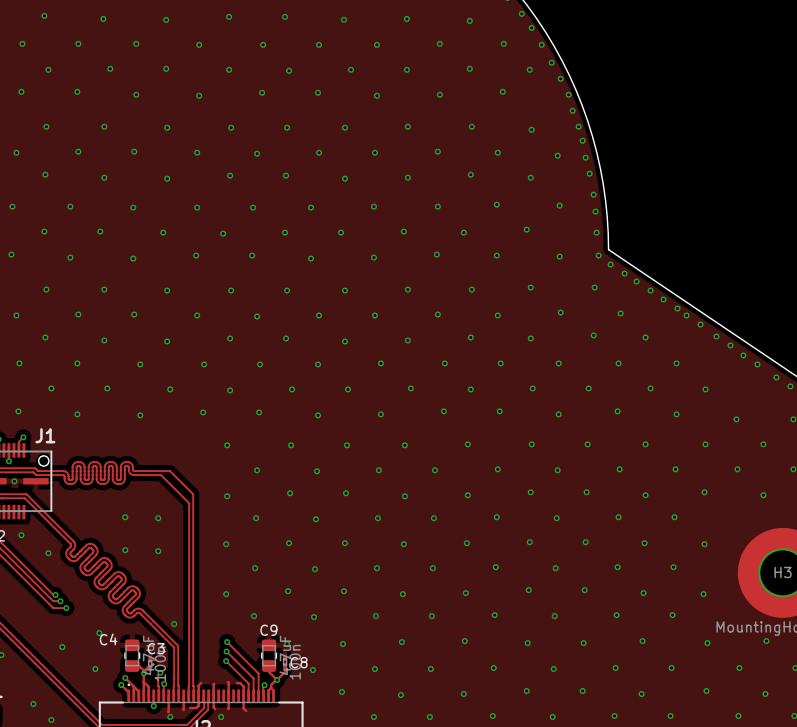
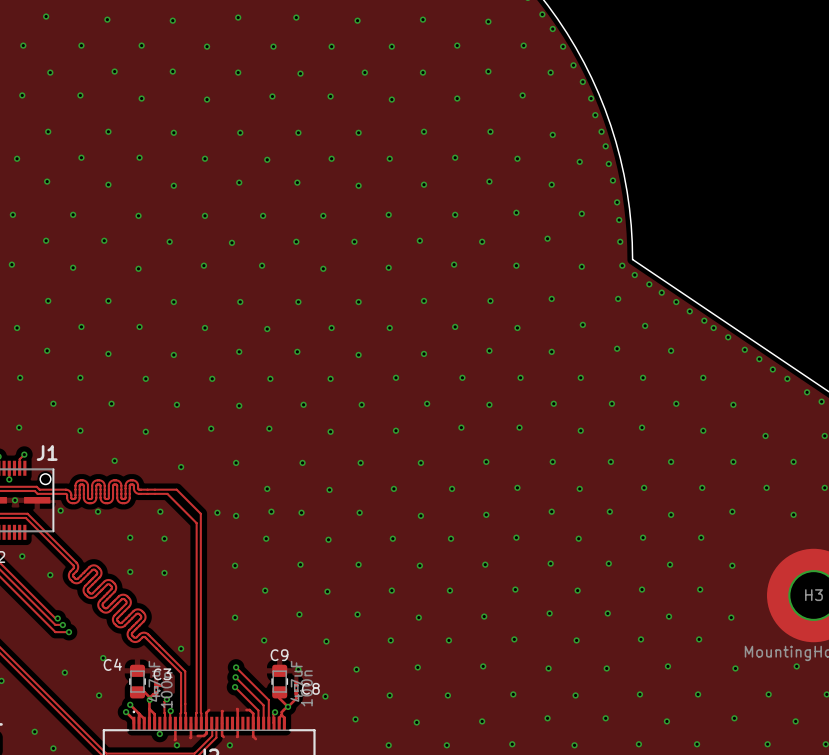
via: none -> (114, 460)
via: none -> (181, 467)
via: none -> (60, 510)
via: none -> (98, 511)
via: none -> (160, 511)
via: none -> (271, 511)
via: none -> (217, 512)

